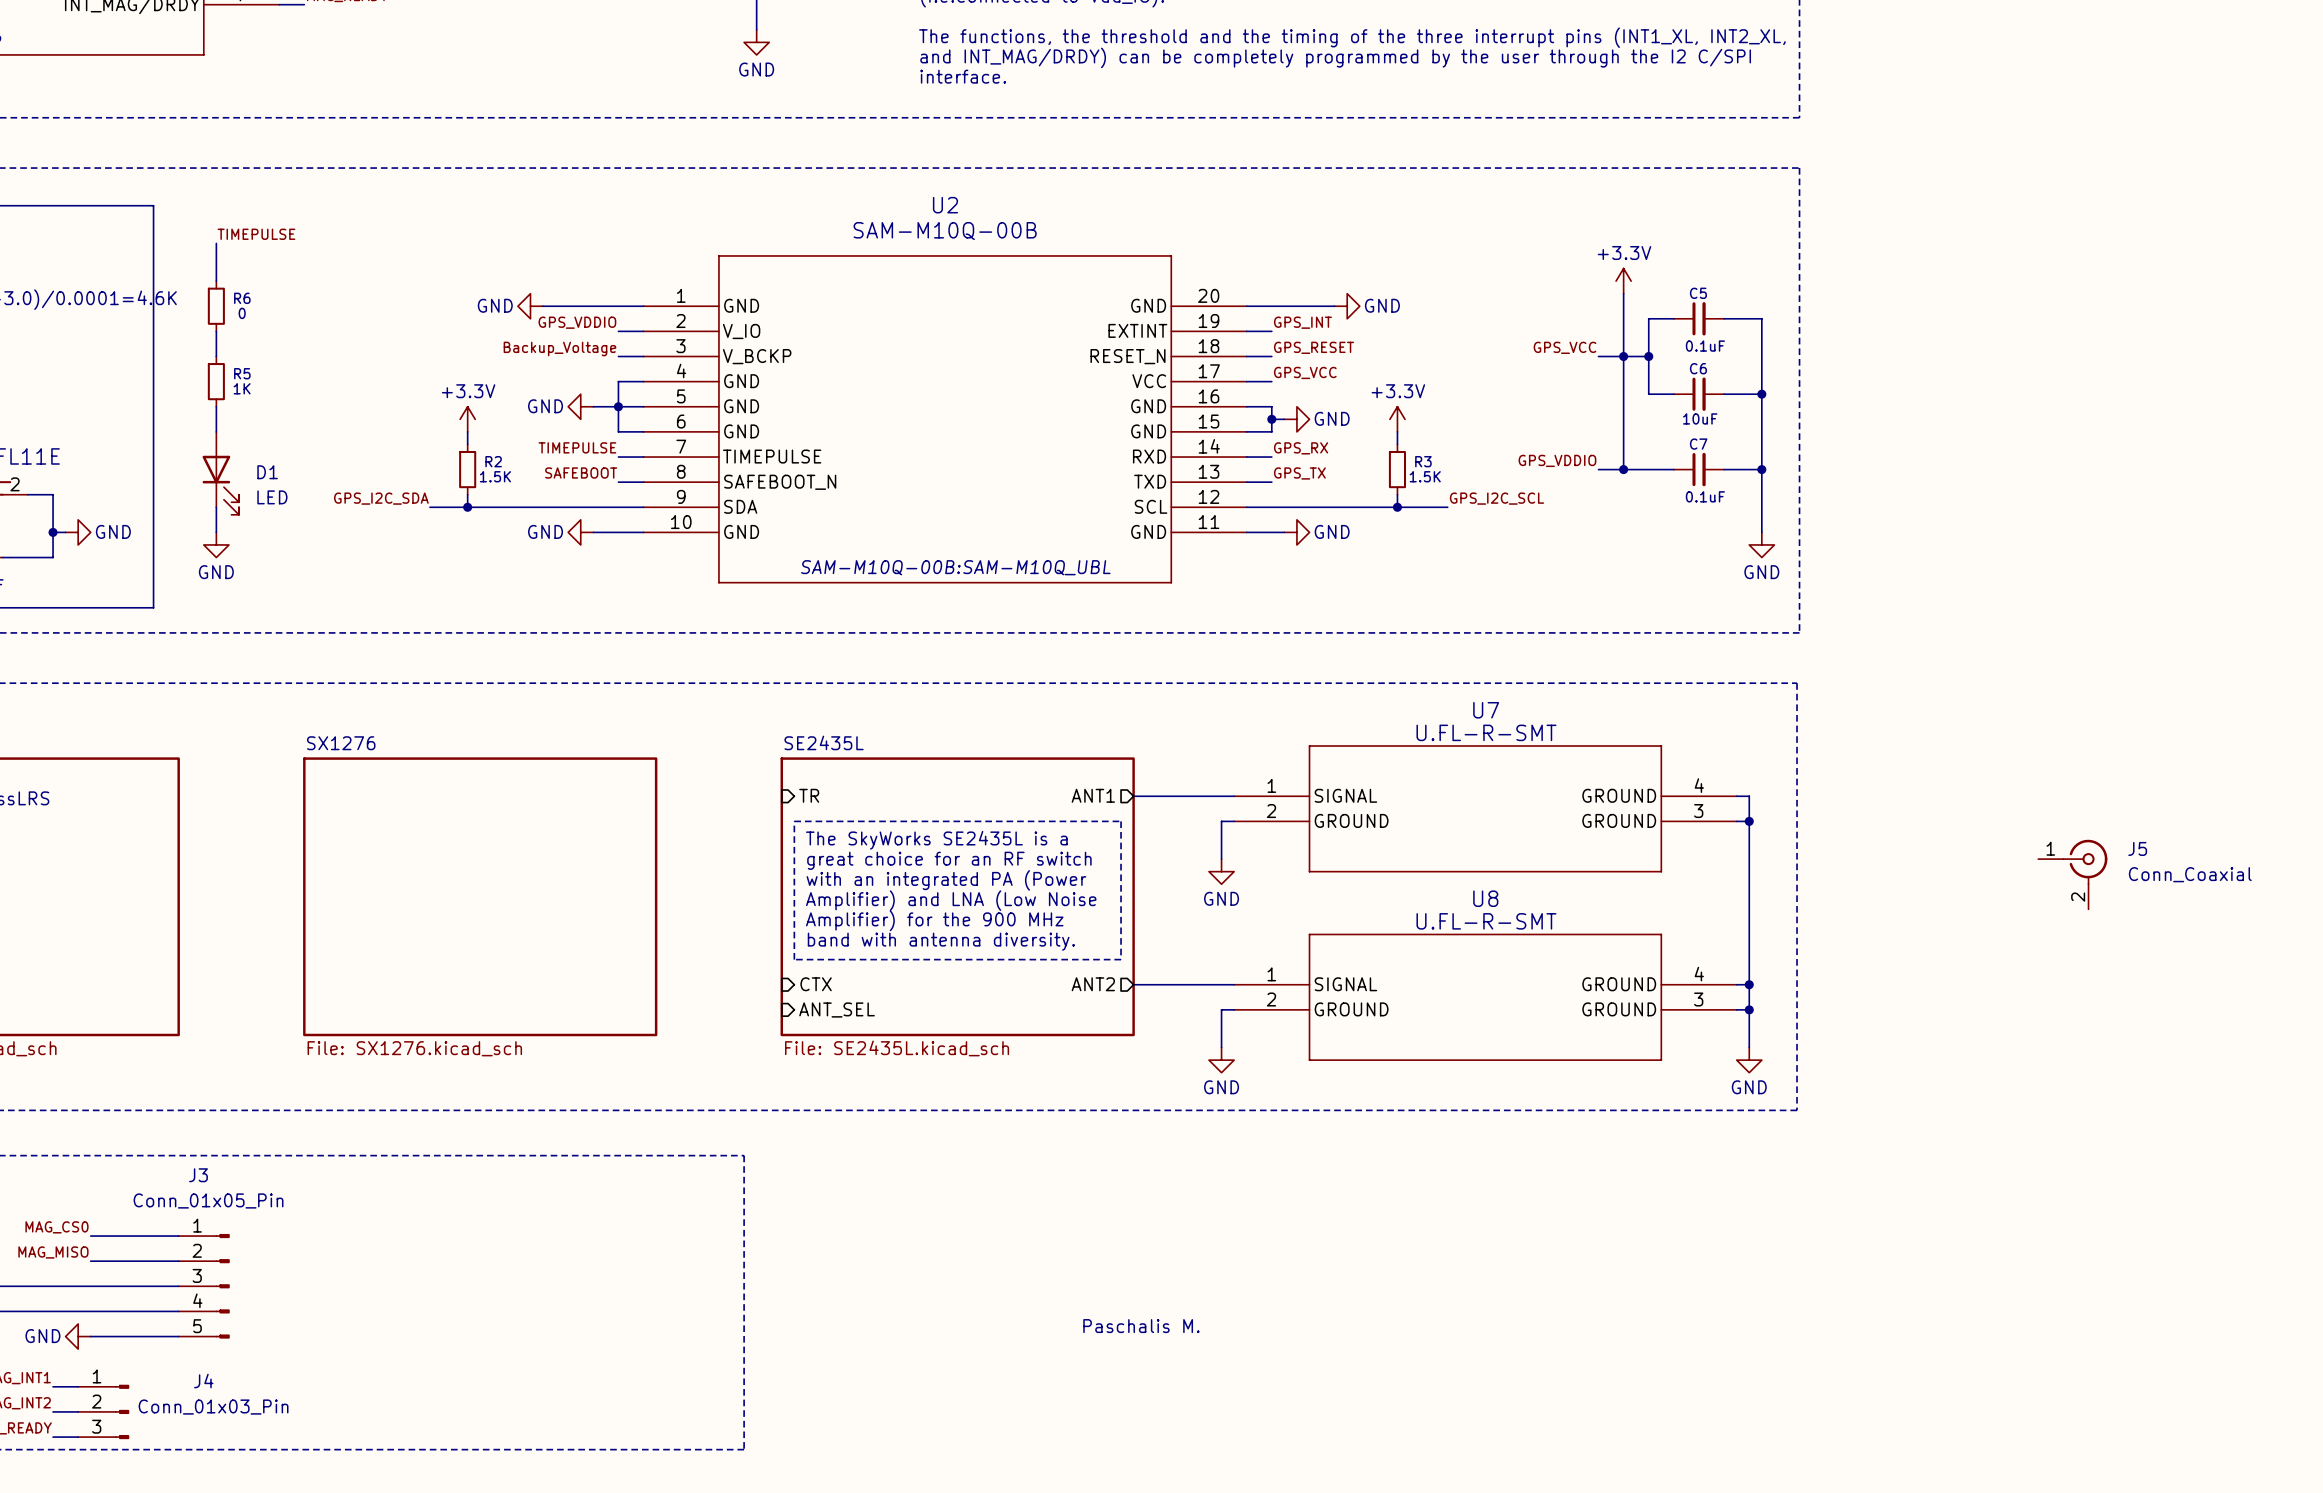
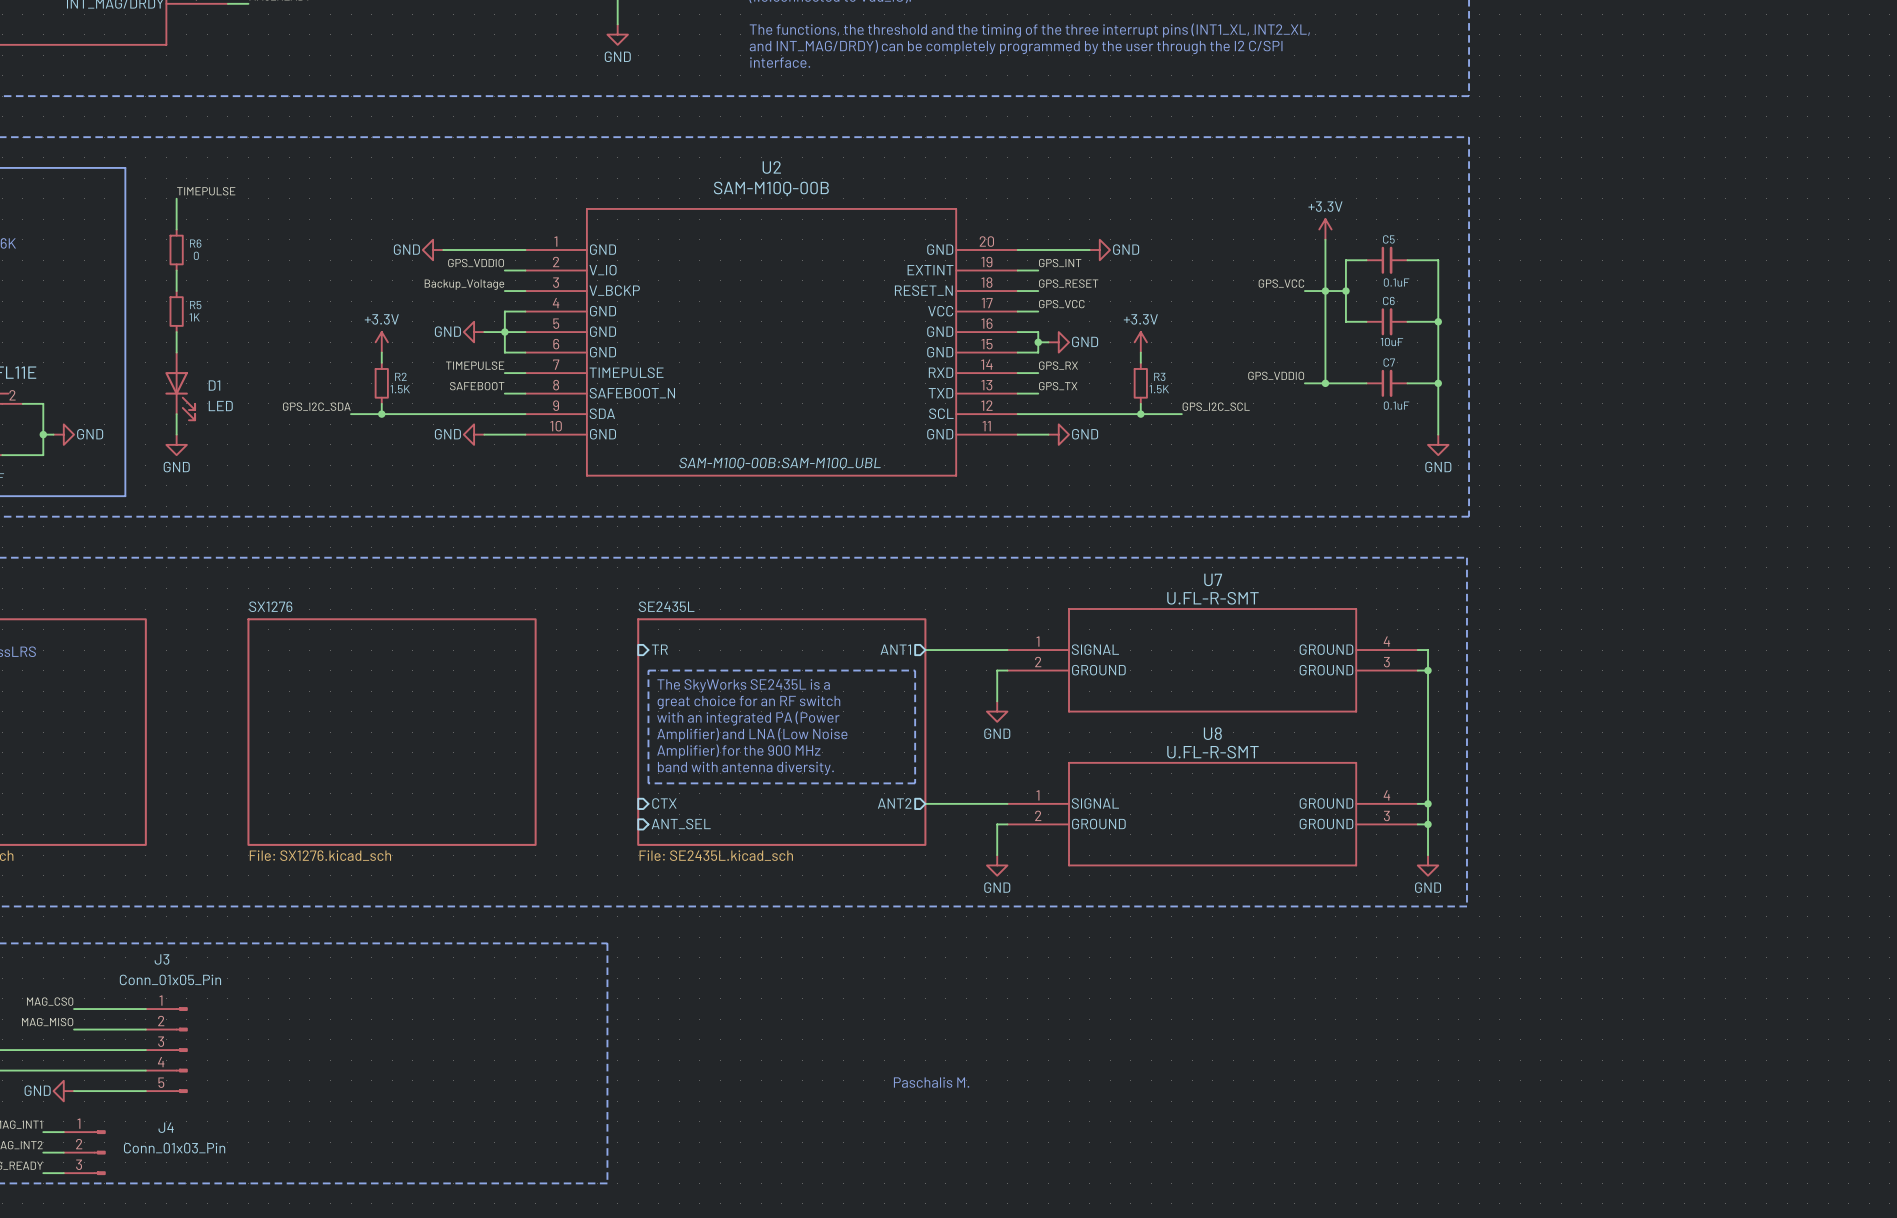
J5: Conn_Coaxial (2072, 874) -> none

